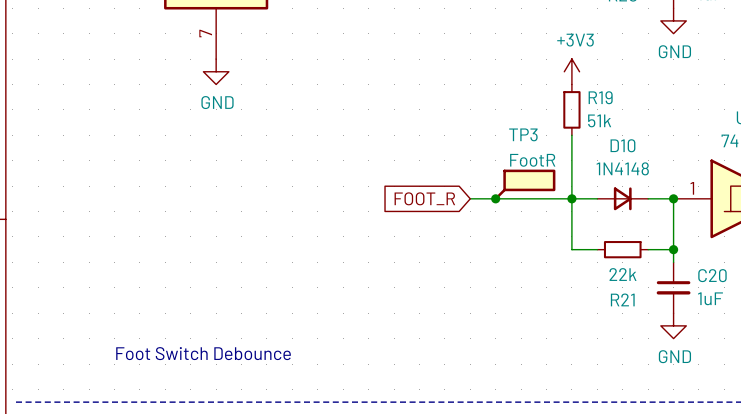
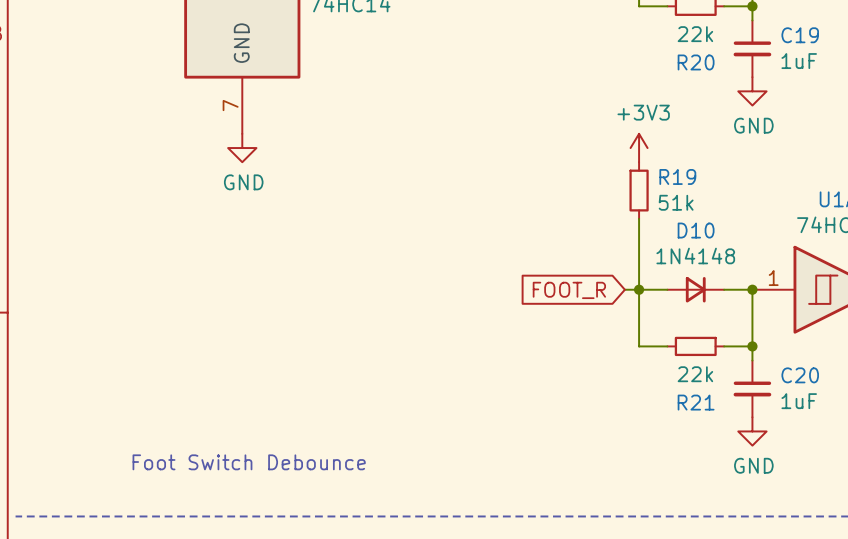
TP3: FootR (524, 184) -> none
global label position: FOOT_R (424, 198) -> FOOT_R (569, 290)
wire: (470, 198) (559, 198) -> none
junction: (495, 198) -> none

